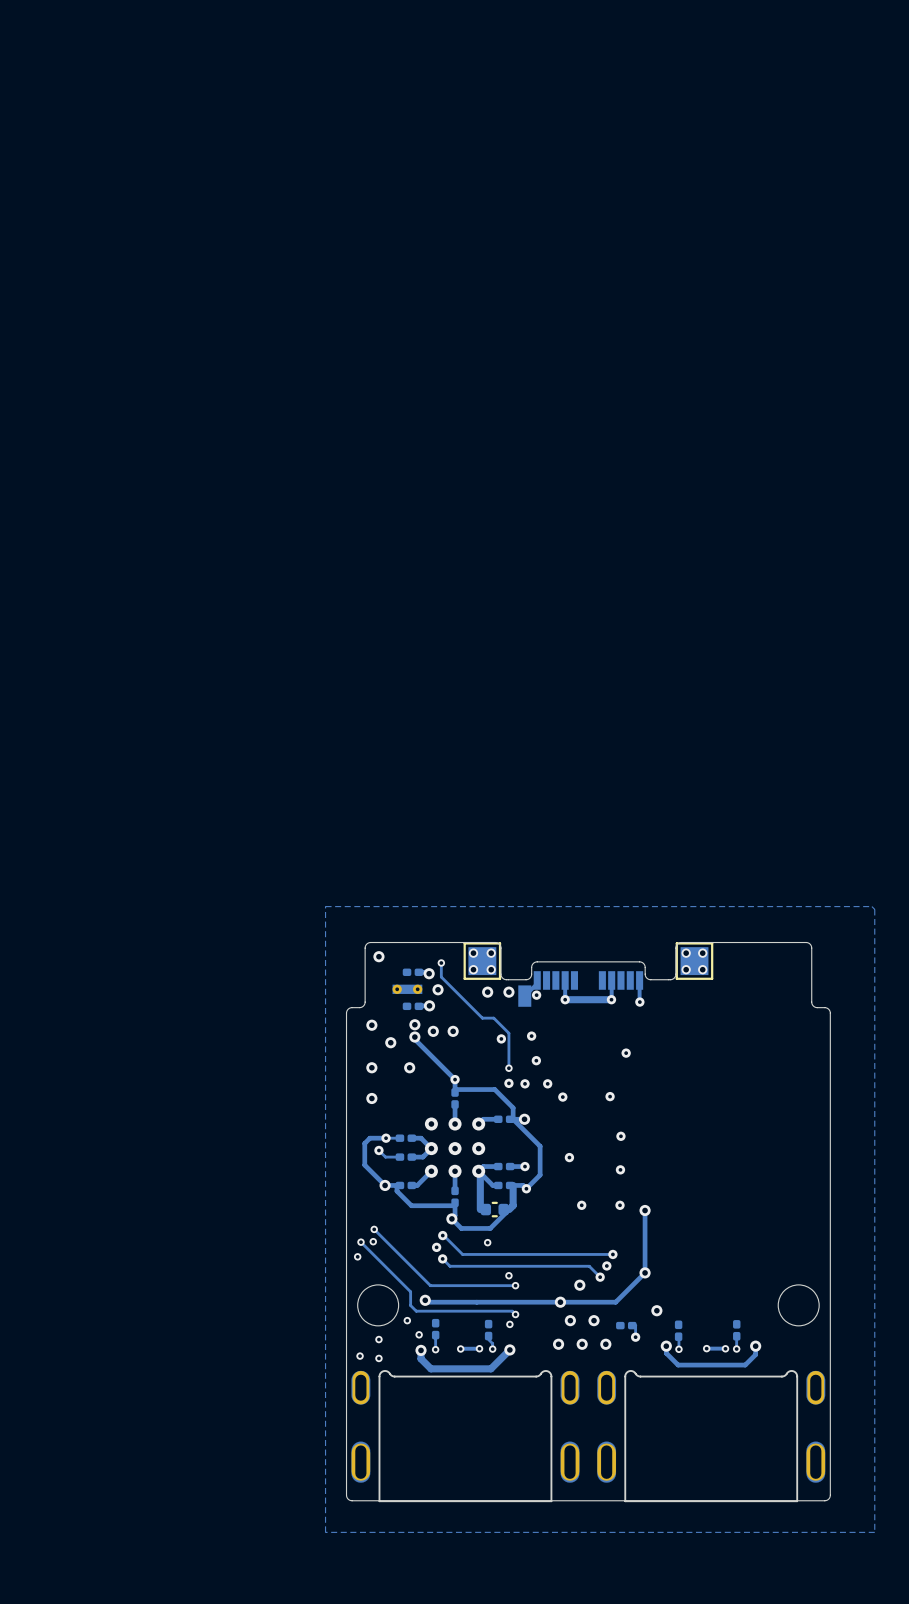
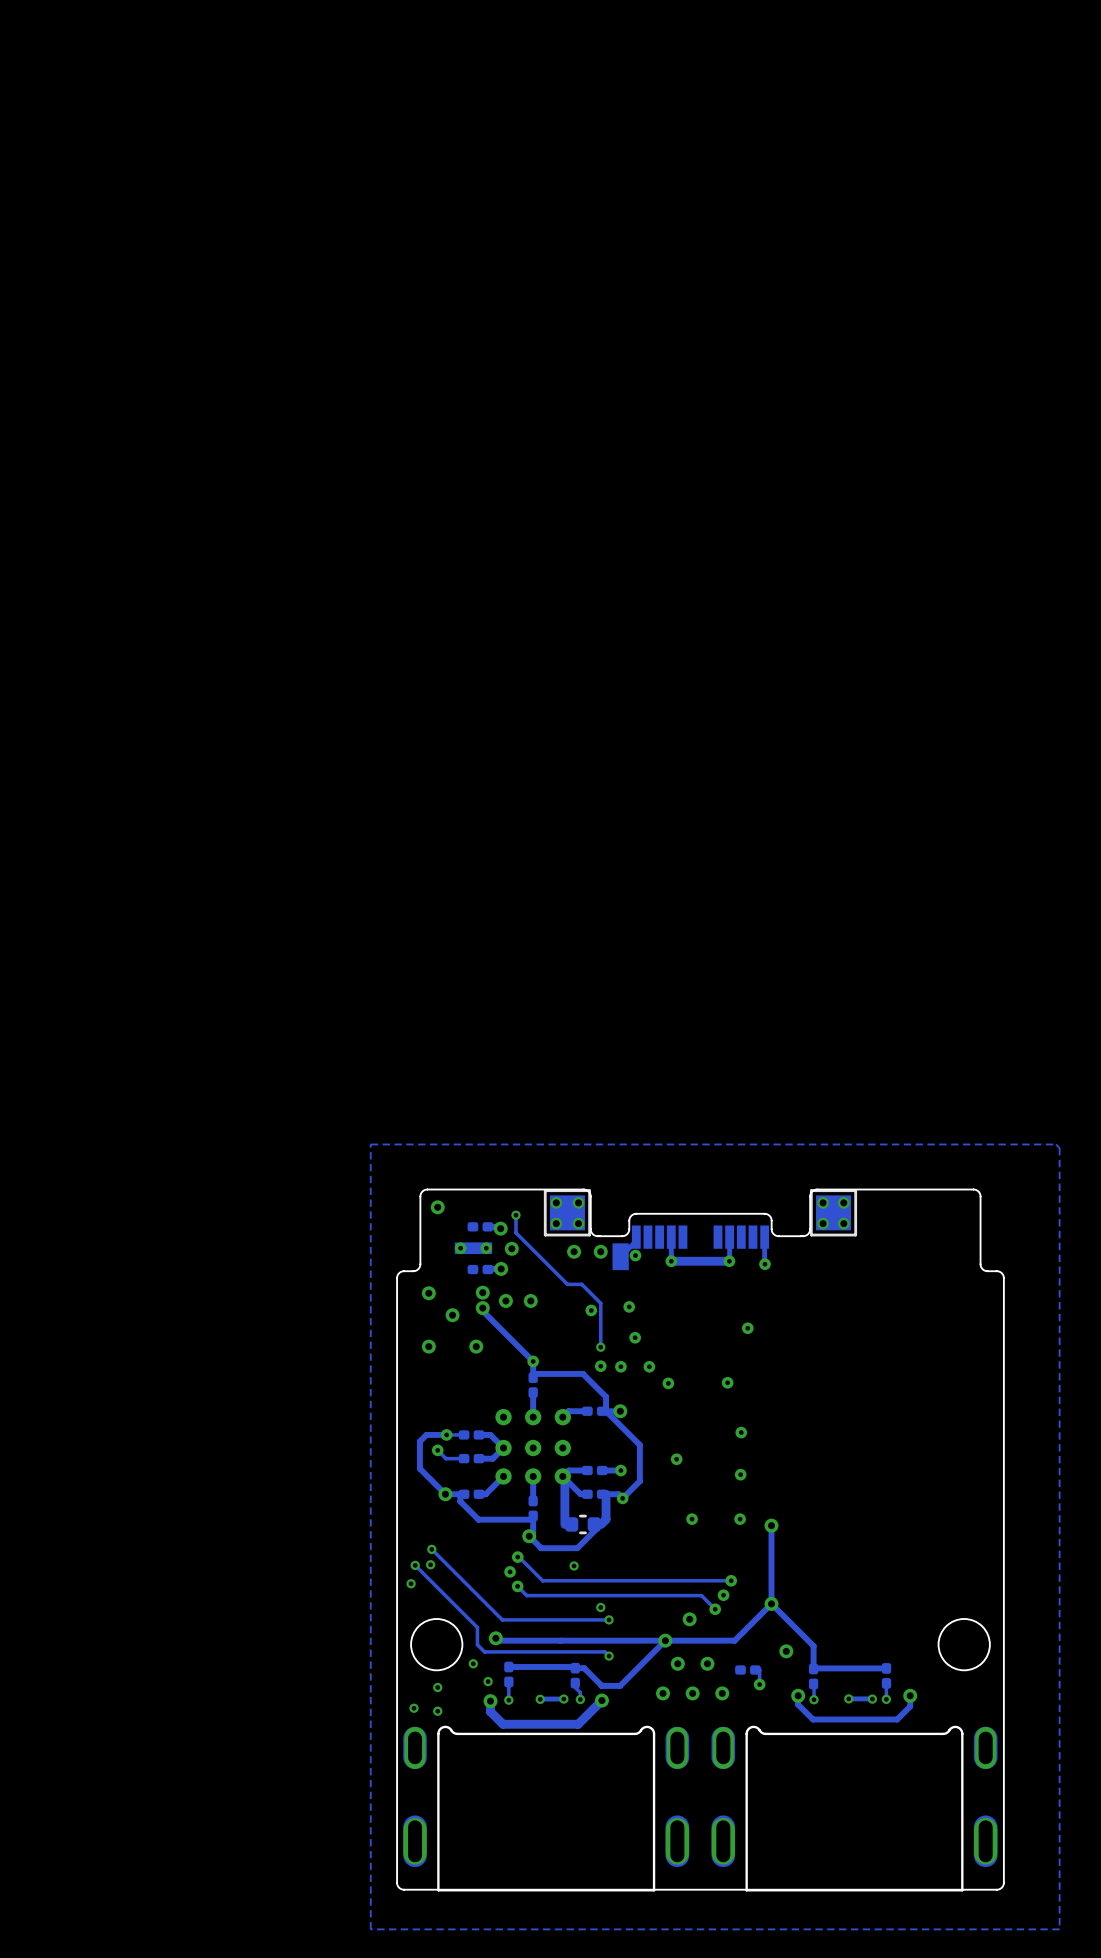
via: (371, 1098) -> none
track: none -> (771, 1603) (813, 1646) (813, 1669) (886, 1668)
track: none -> (665, 1640) (620, 1685) (601, 1685)
track: none -> (508, 1666) (584, 1668) (601, 1685)
via: (509, 1324) -> none

